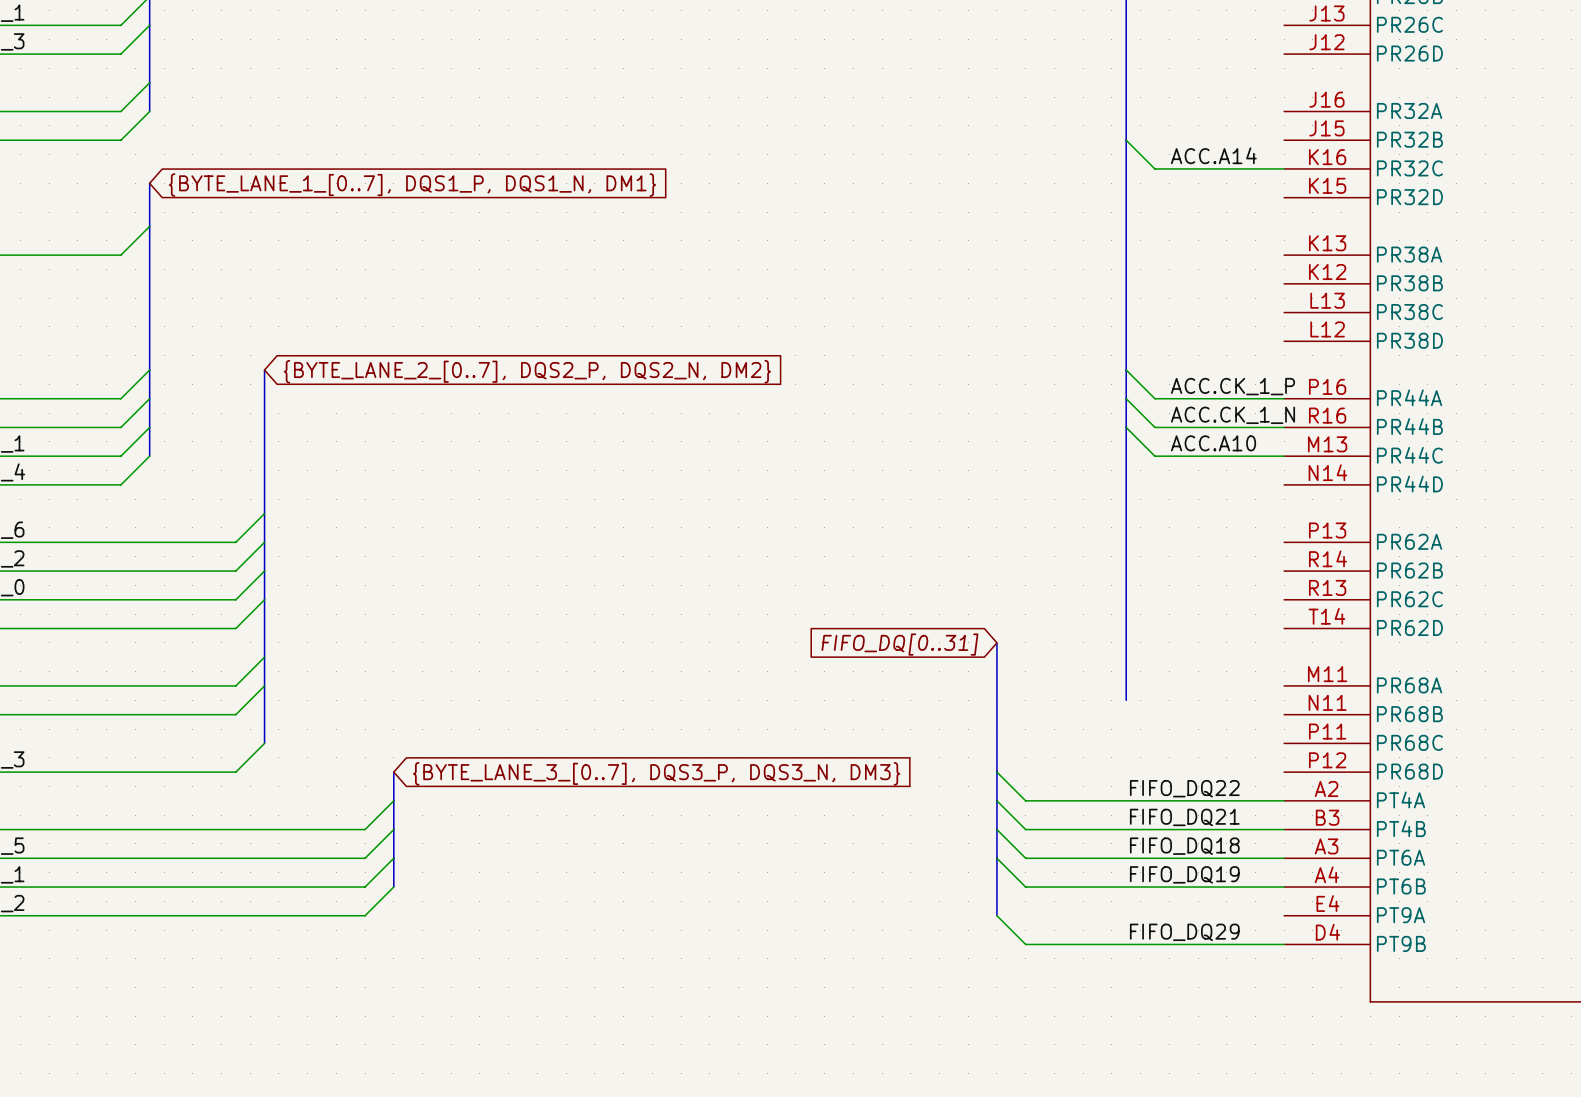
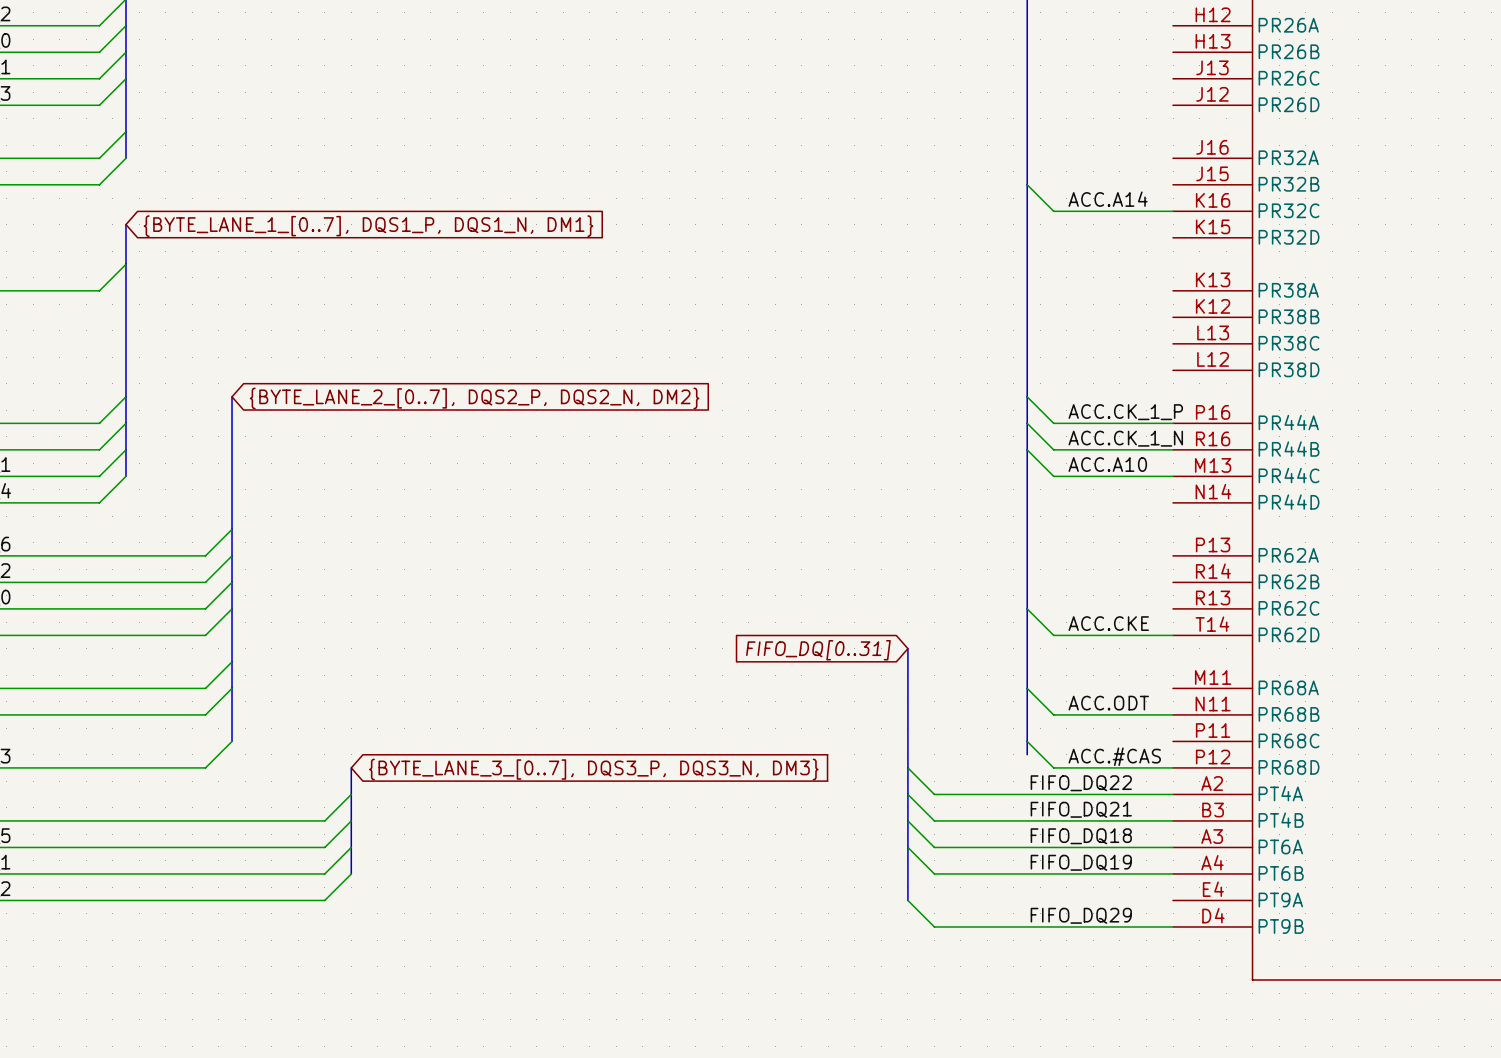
wire: none -> (1027, 608) (1053, 635) (1173, 635)
label: none -> ACC.CKE (1108, 623)
wire: none -> (1027, 688) (1053, 714) (1173, 714)
bus: none -> (1027, 701) (1027, 754)
label: none -> ACC.ODT (1108, 703)
wire: none -> (1027, 741) (1053, 767) (1173, 767)
label: none -> ACC.#CAS (1114, 756)

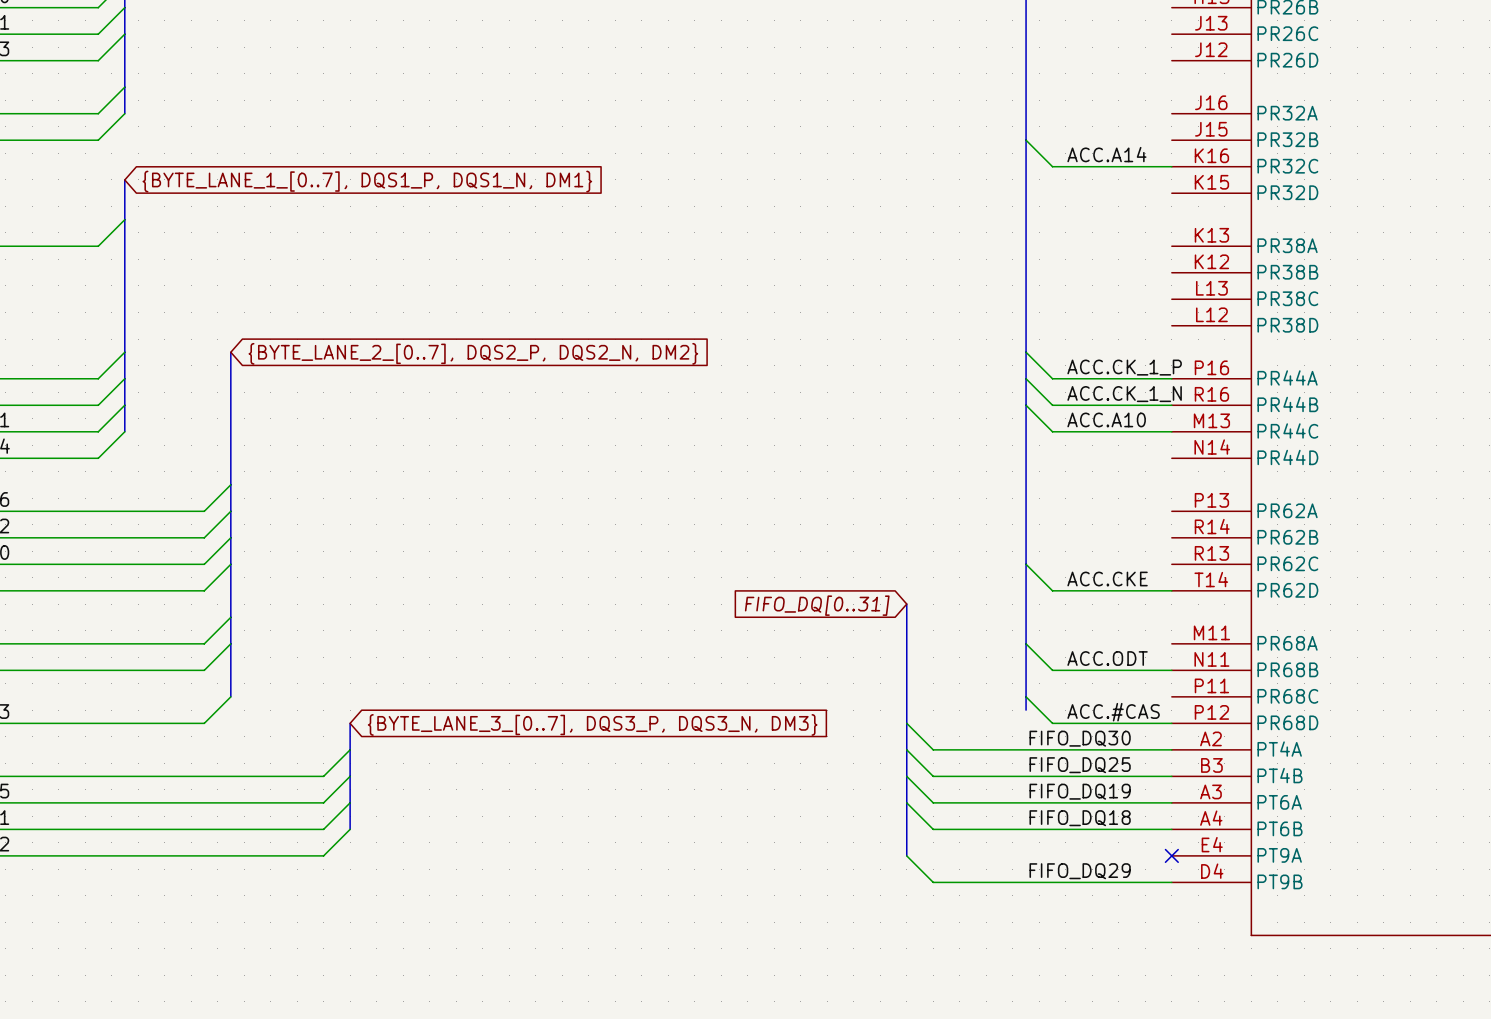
label: FIFO_DQ22 (1081, 783) -> FIFO_DQ30 (1080, 738)
label: FIFO_DQ21 (1081, 809) -> FIFO_DQ25 (1080, 765)
label: FIFO_DQ18 (1081, 836) -> FIFO_DQ19 (1080, 791)
label: FIFO_DQ19 (1081, 862) -> FIFO_DQ18 (1080, 818)
no-connect mark: none -> (1171, 855)

